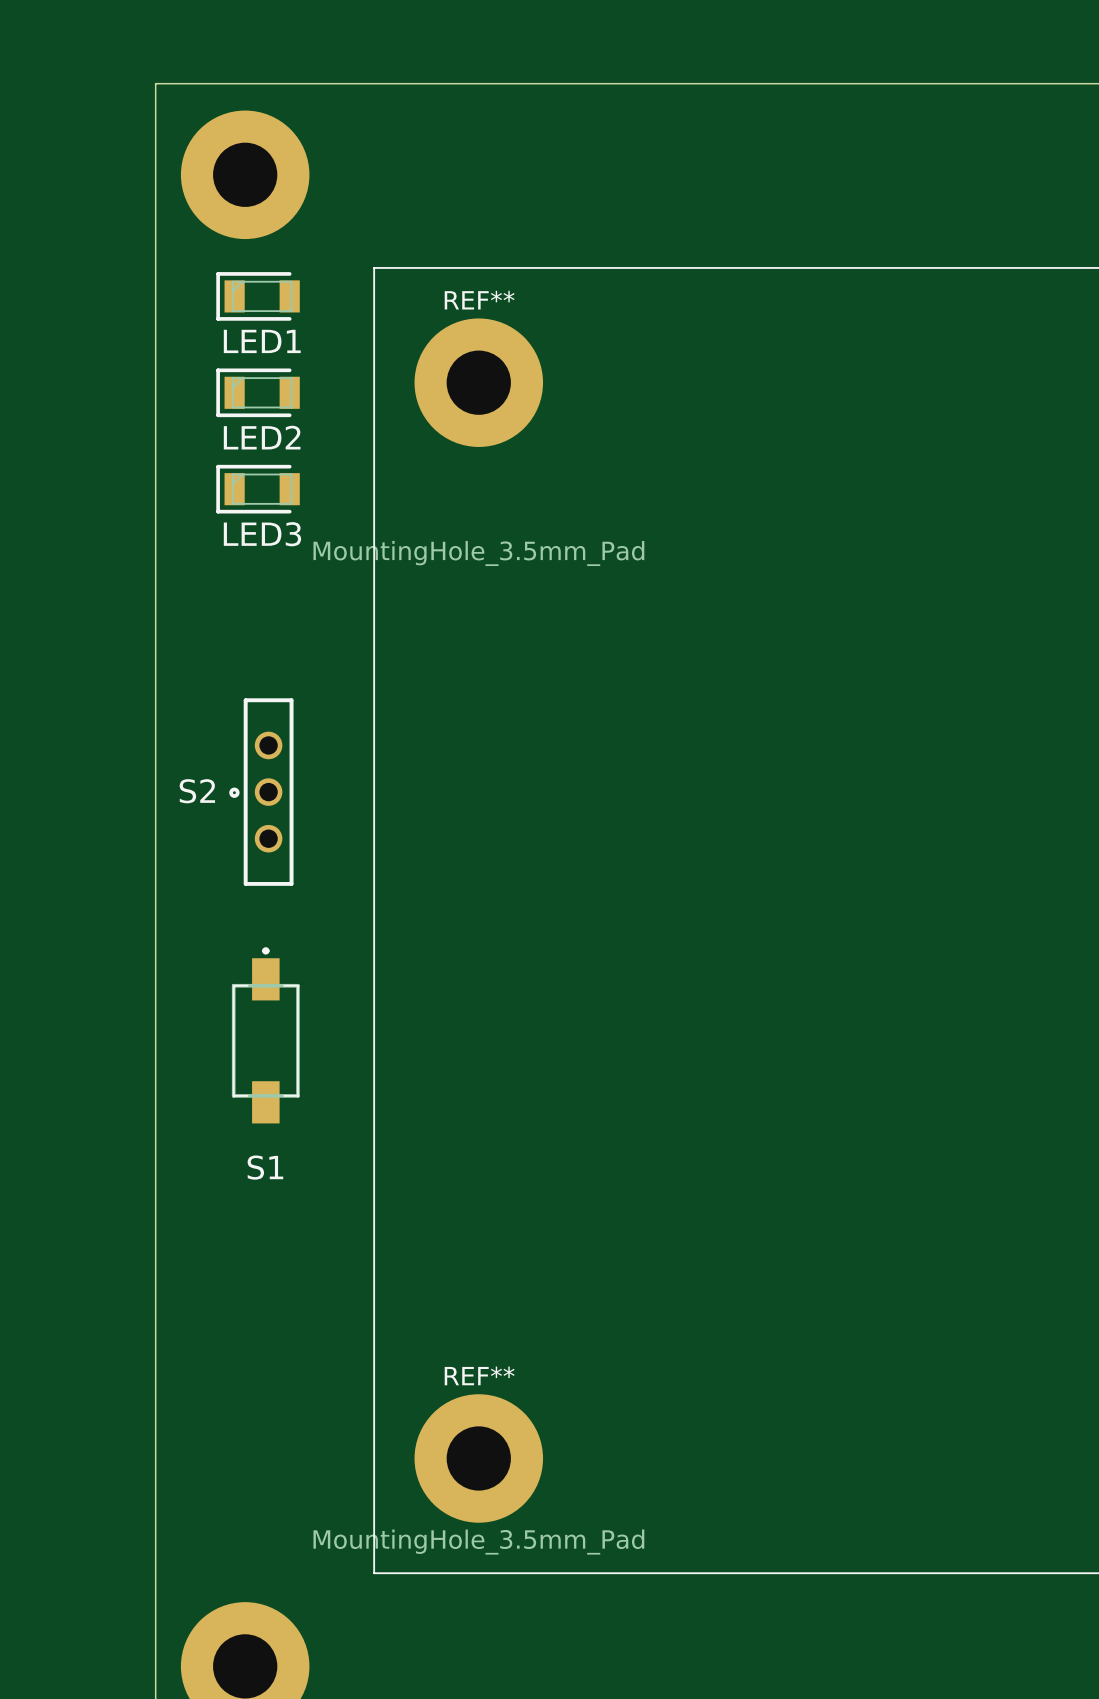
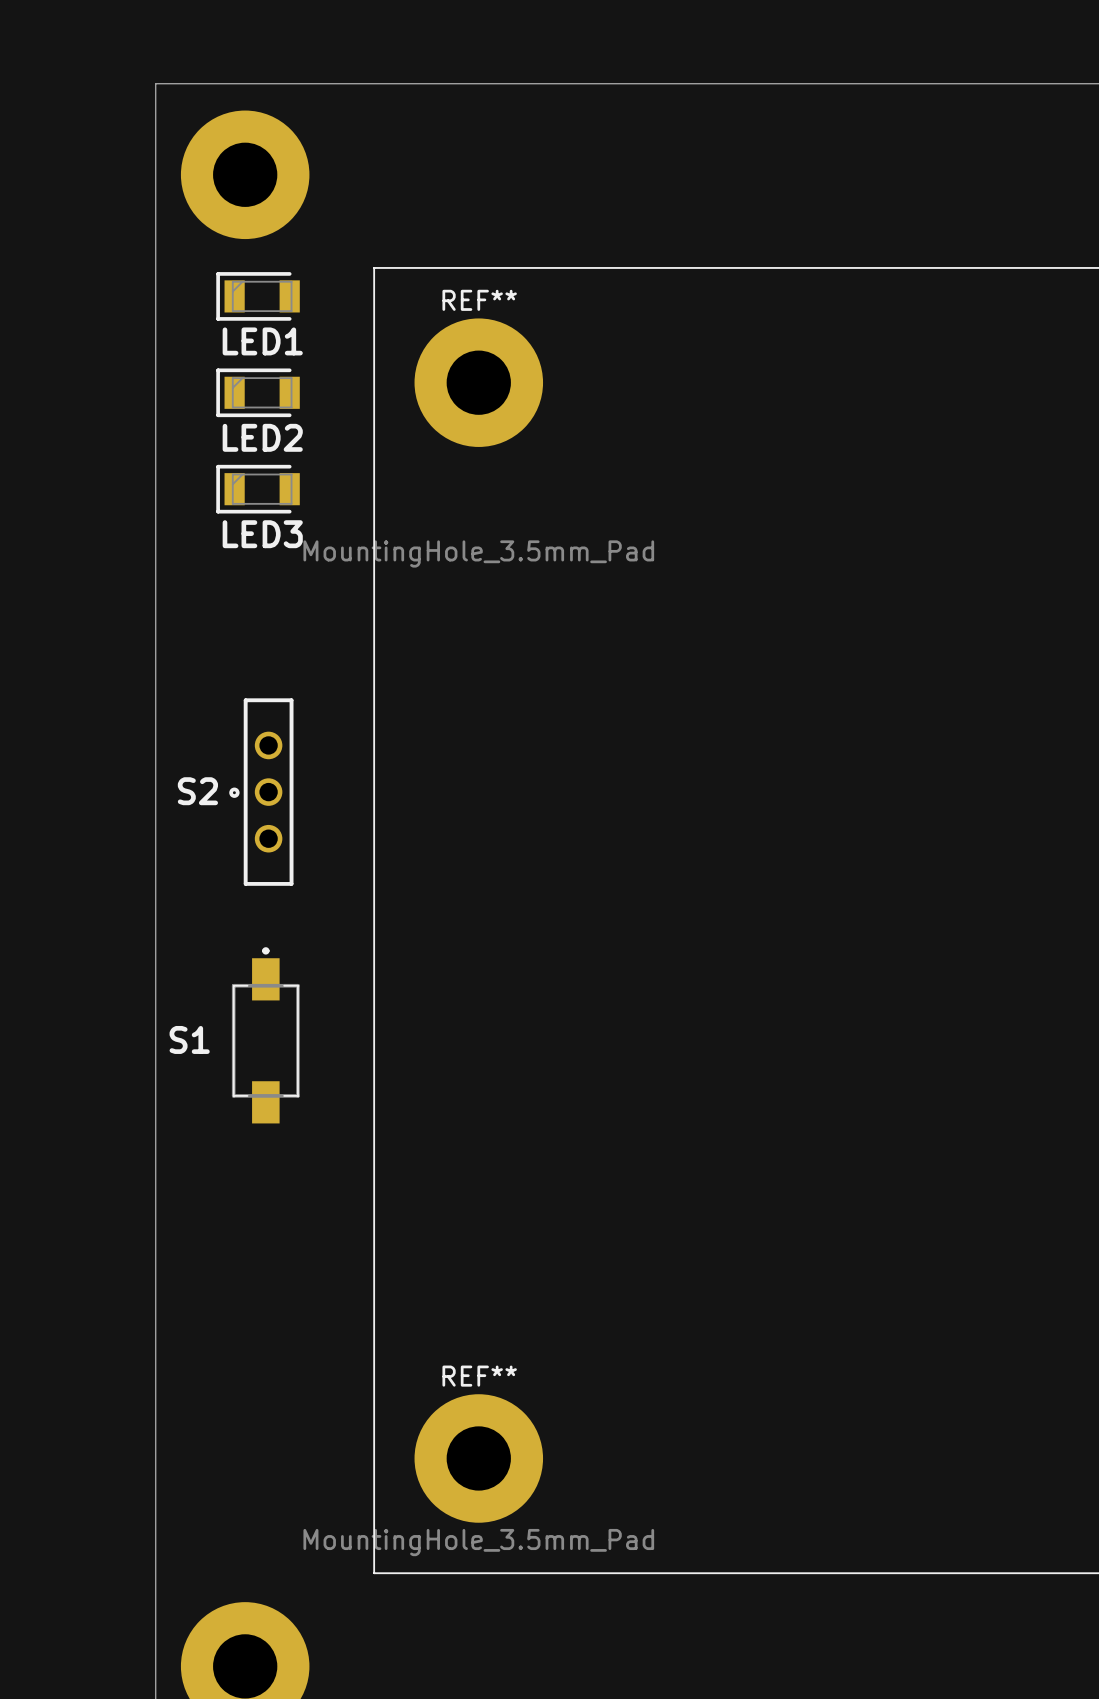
S1 name position: S1 (265, 1167) -> S1 (189, 1039)

